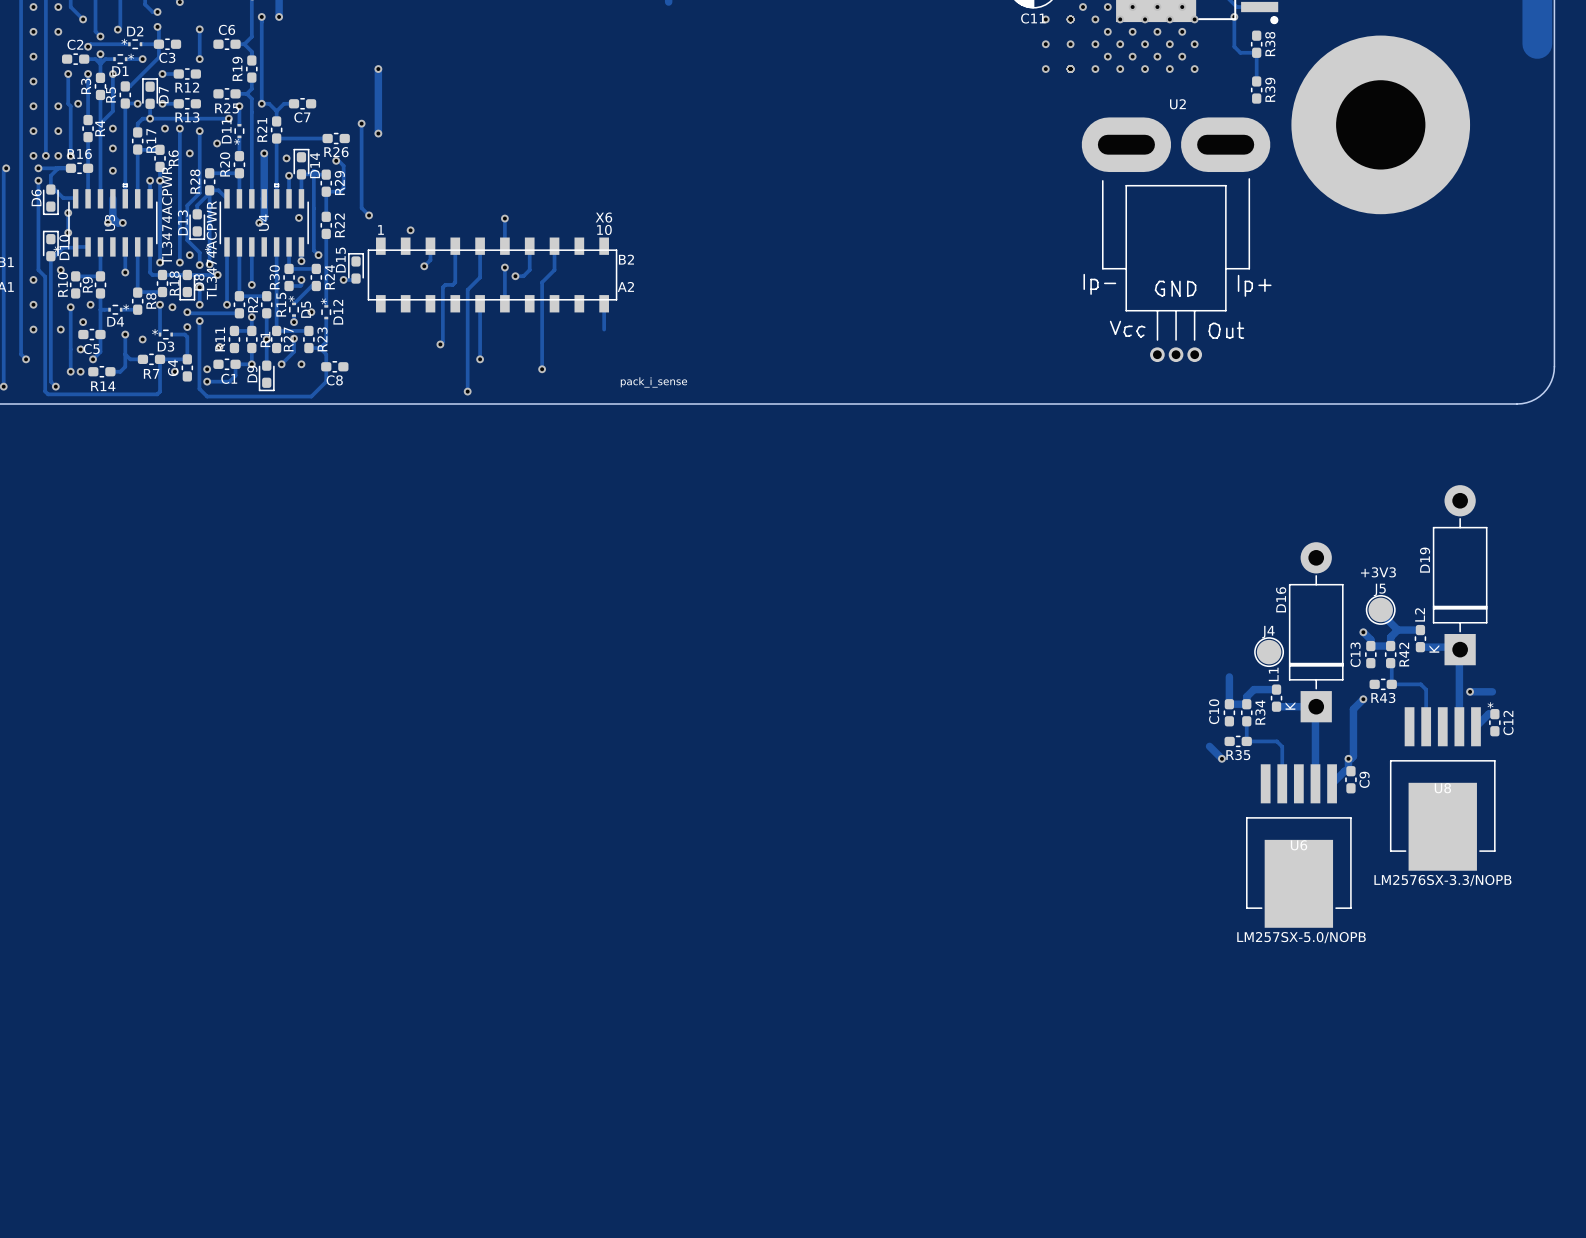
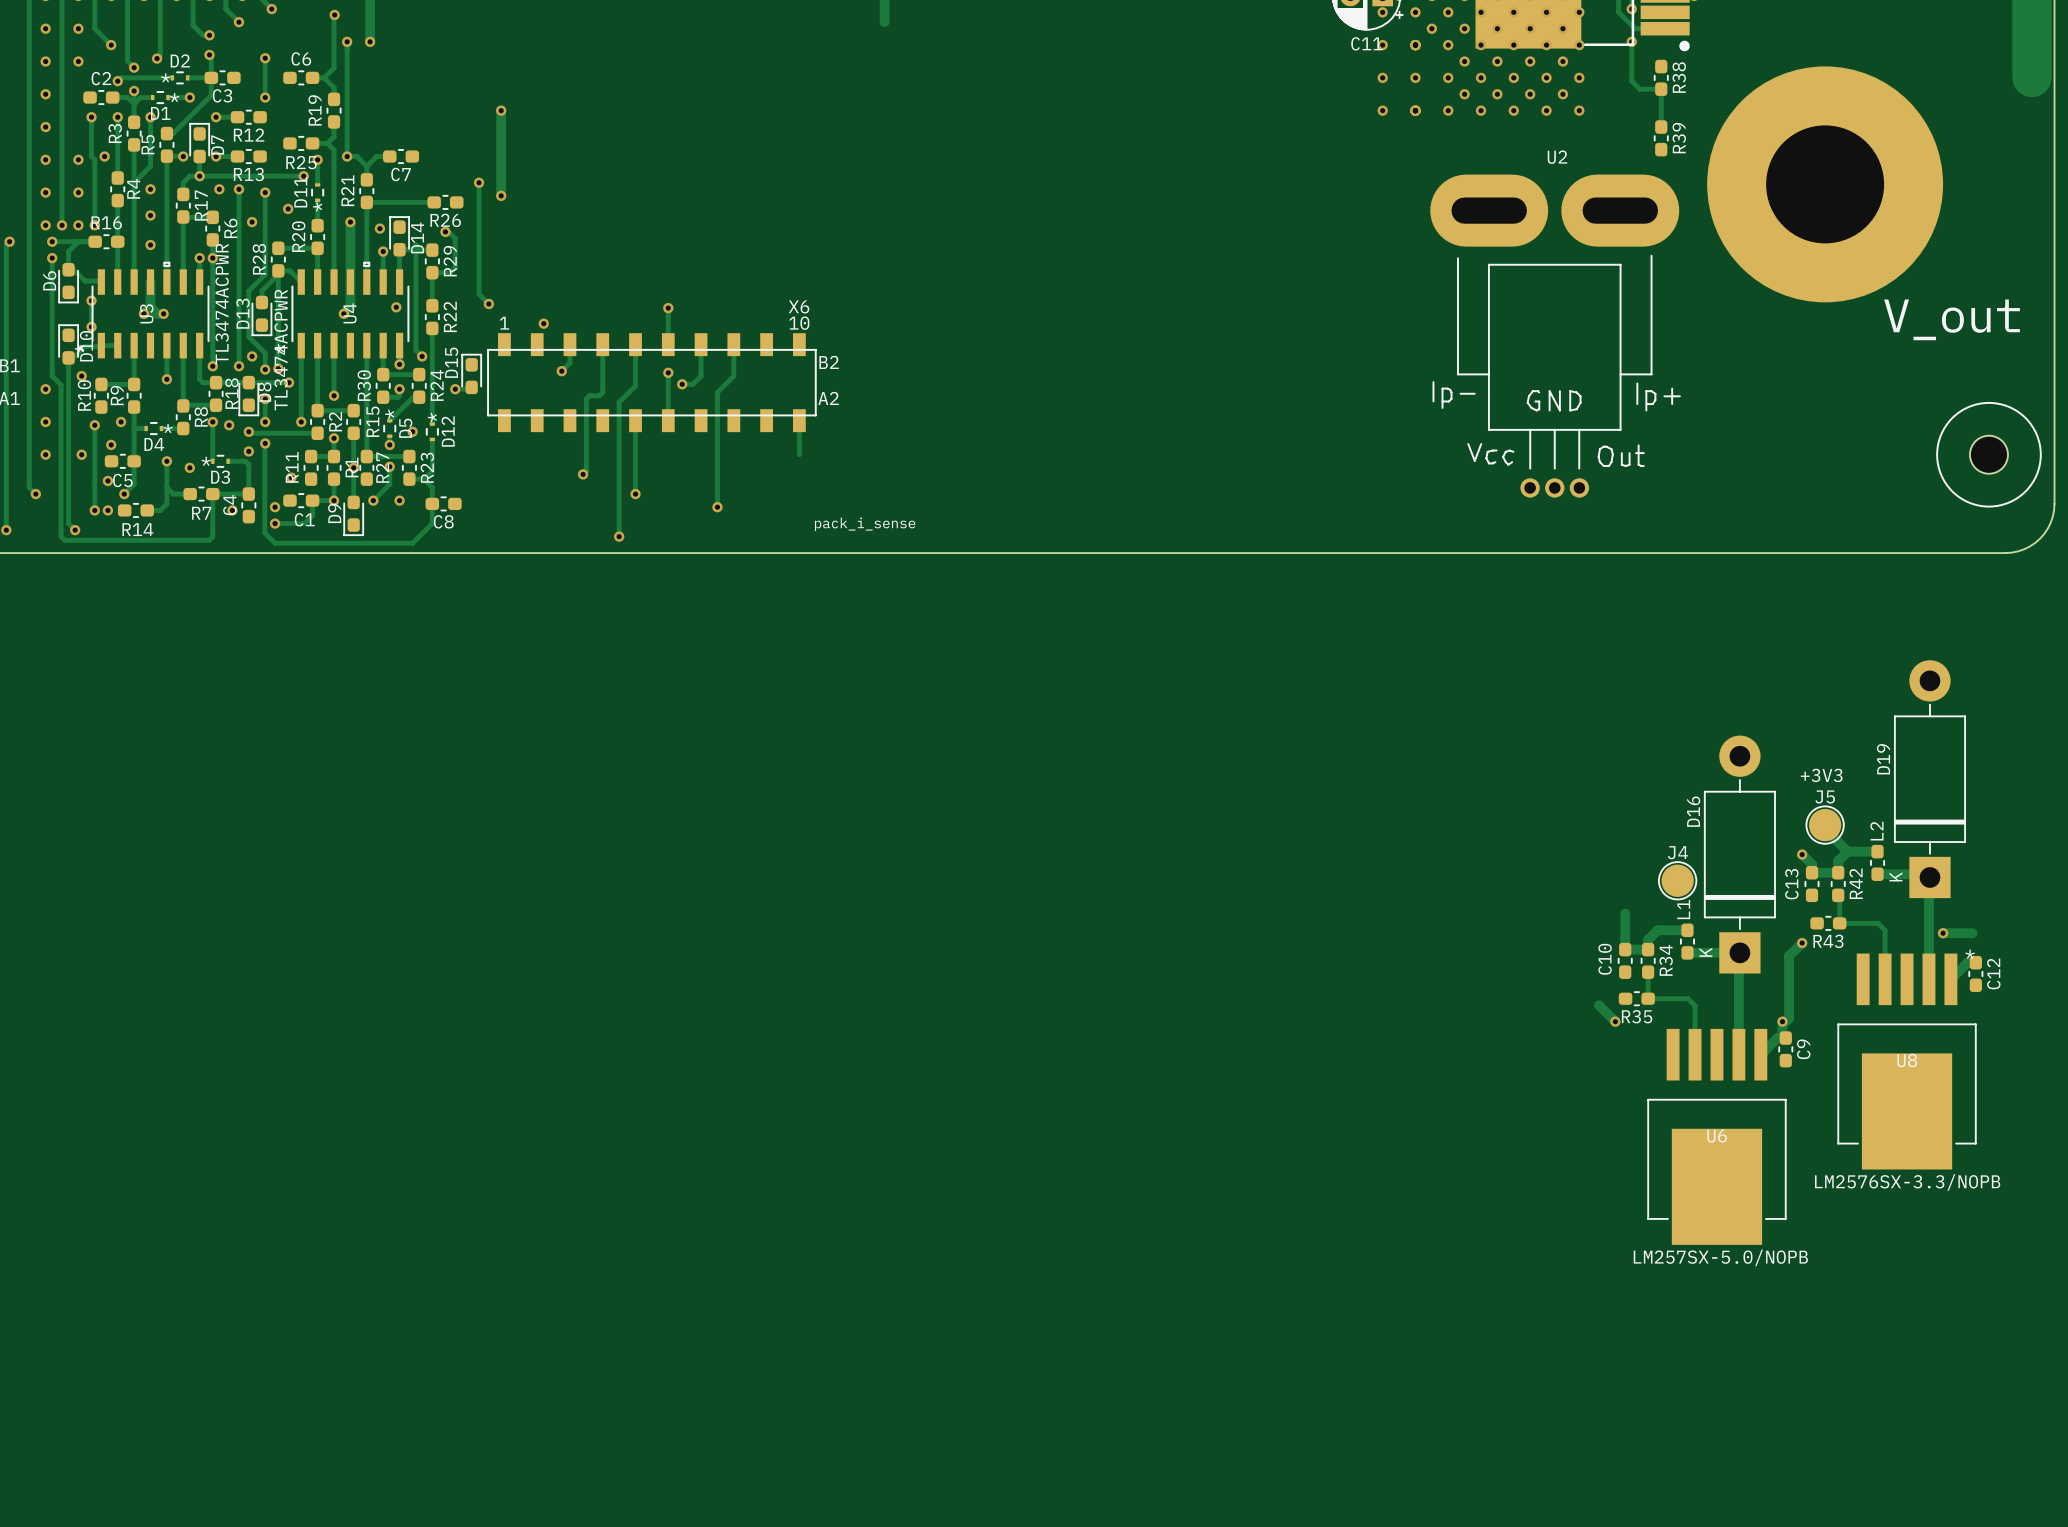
text: none -> V_out (1952, 319)
part: none -> (1988, 454)

